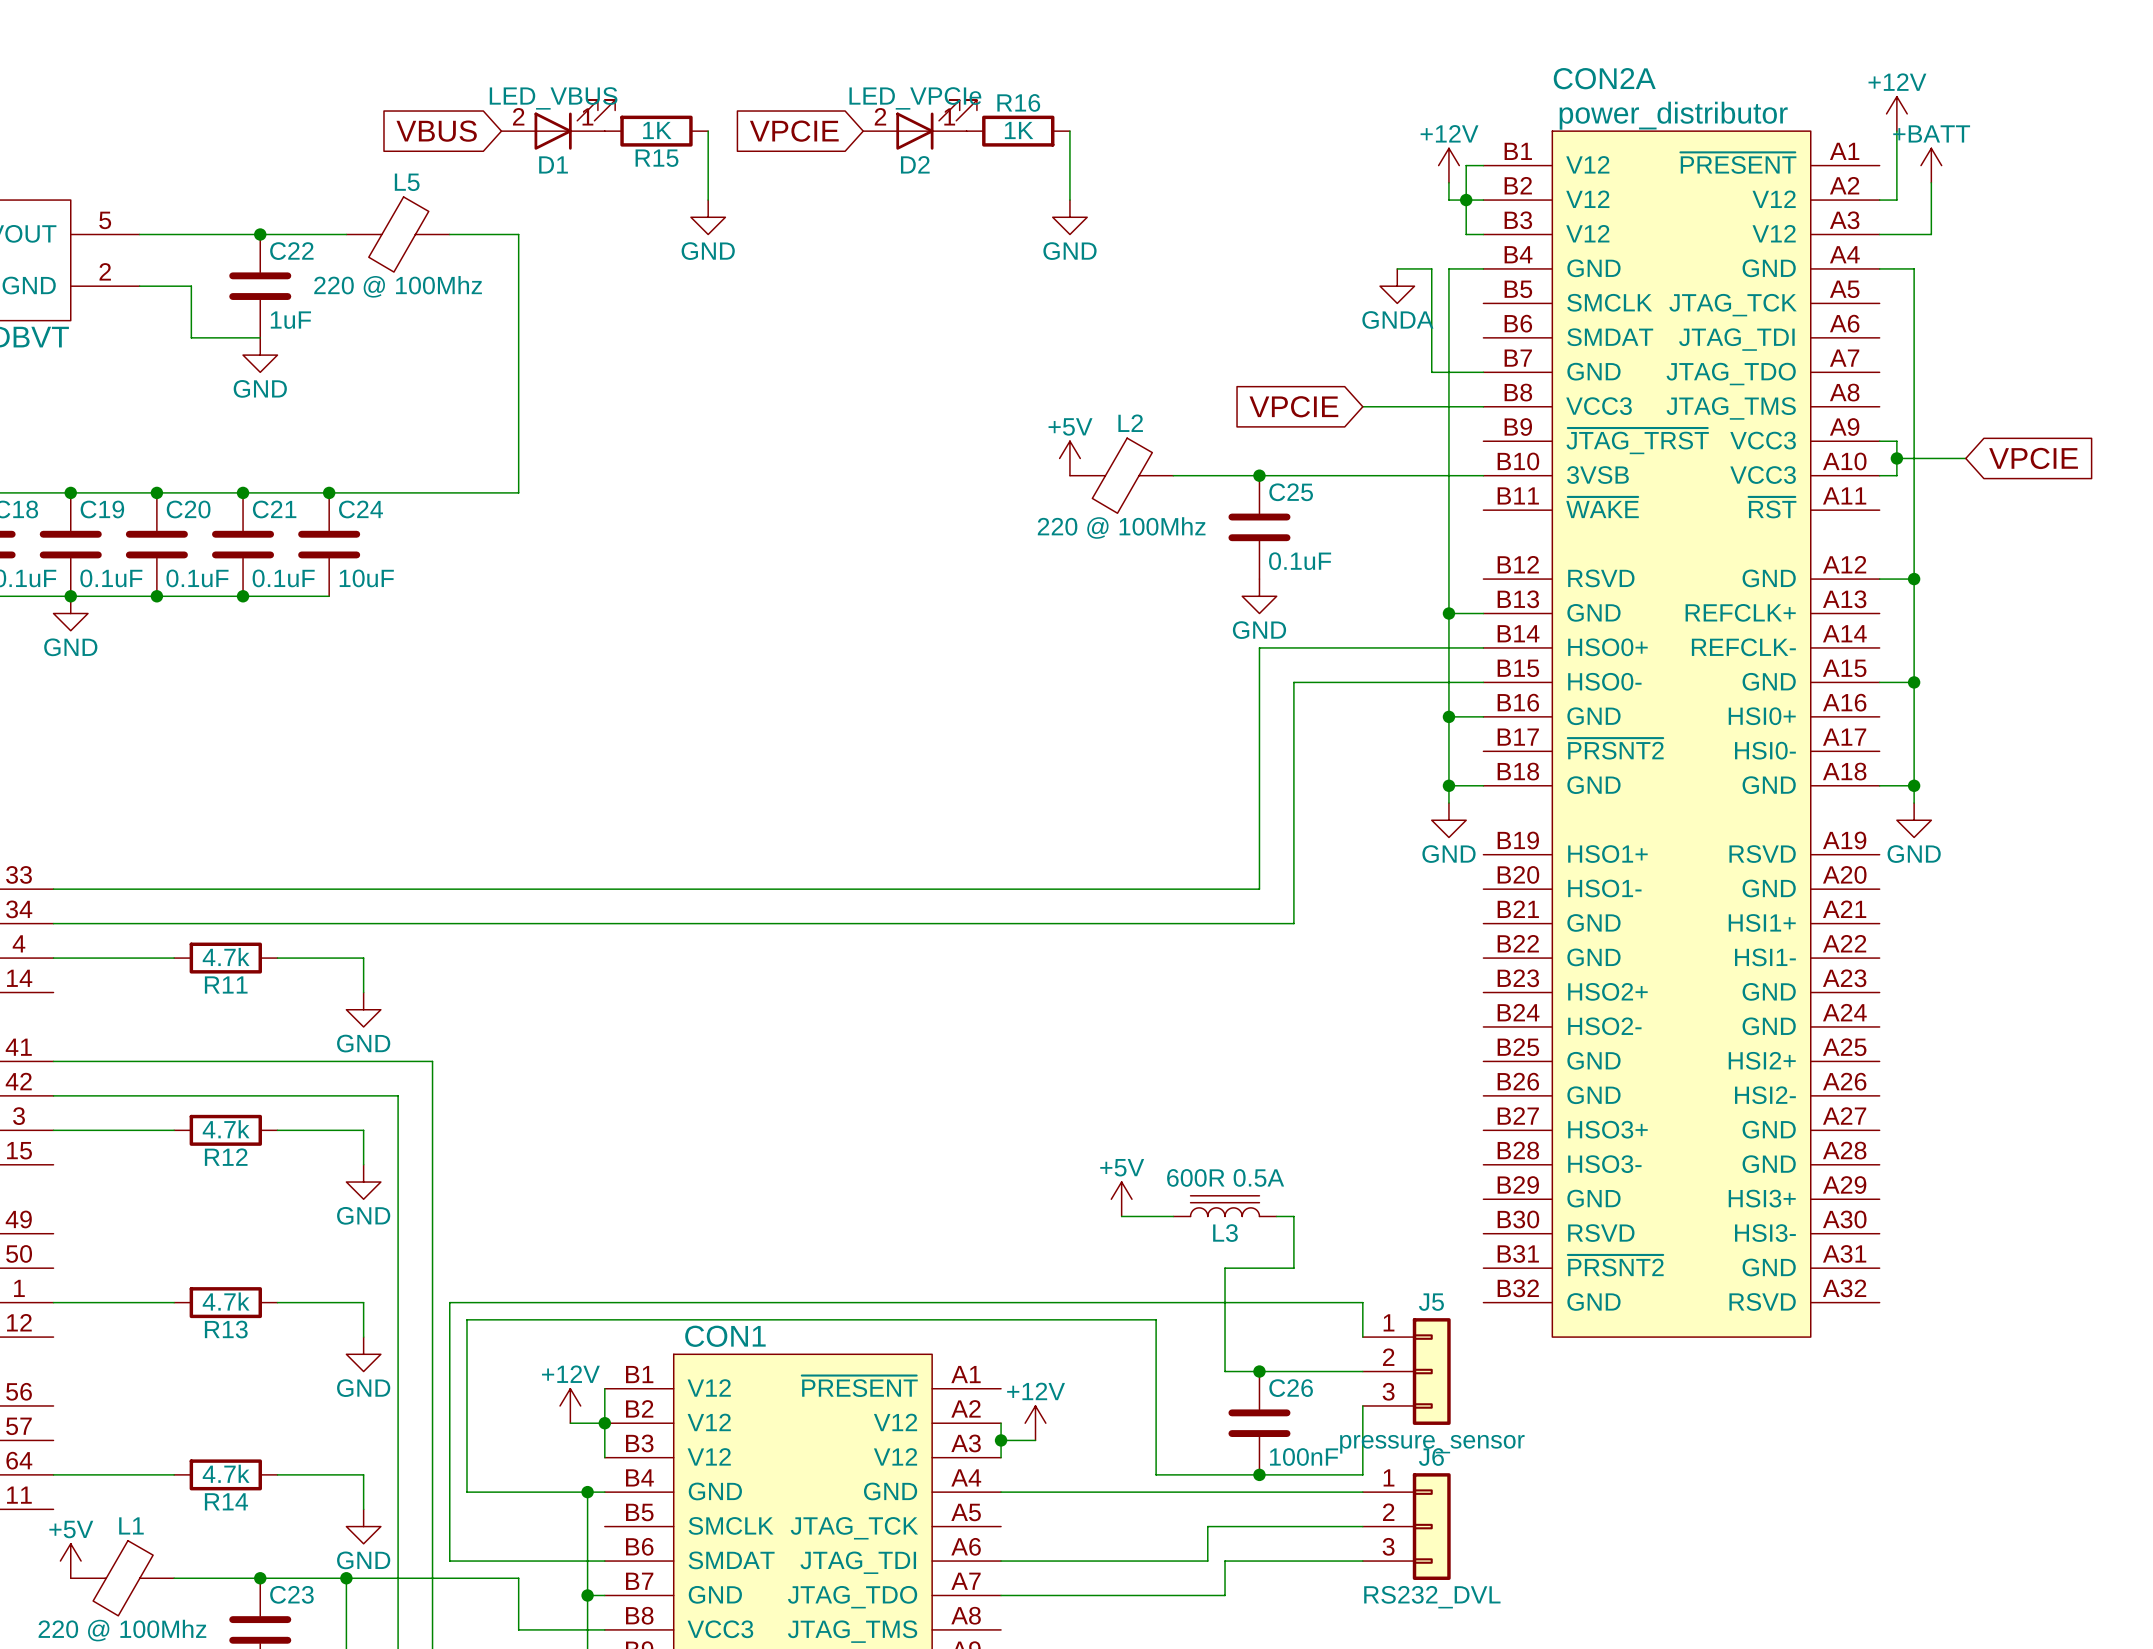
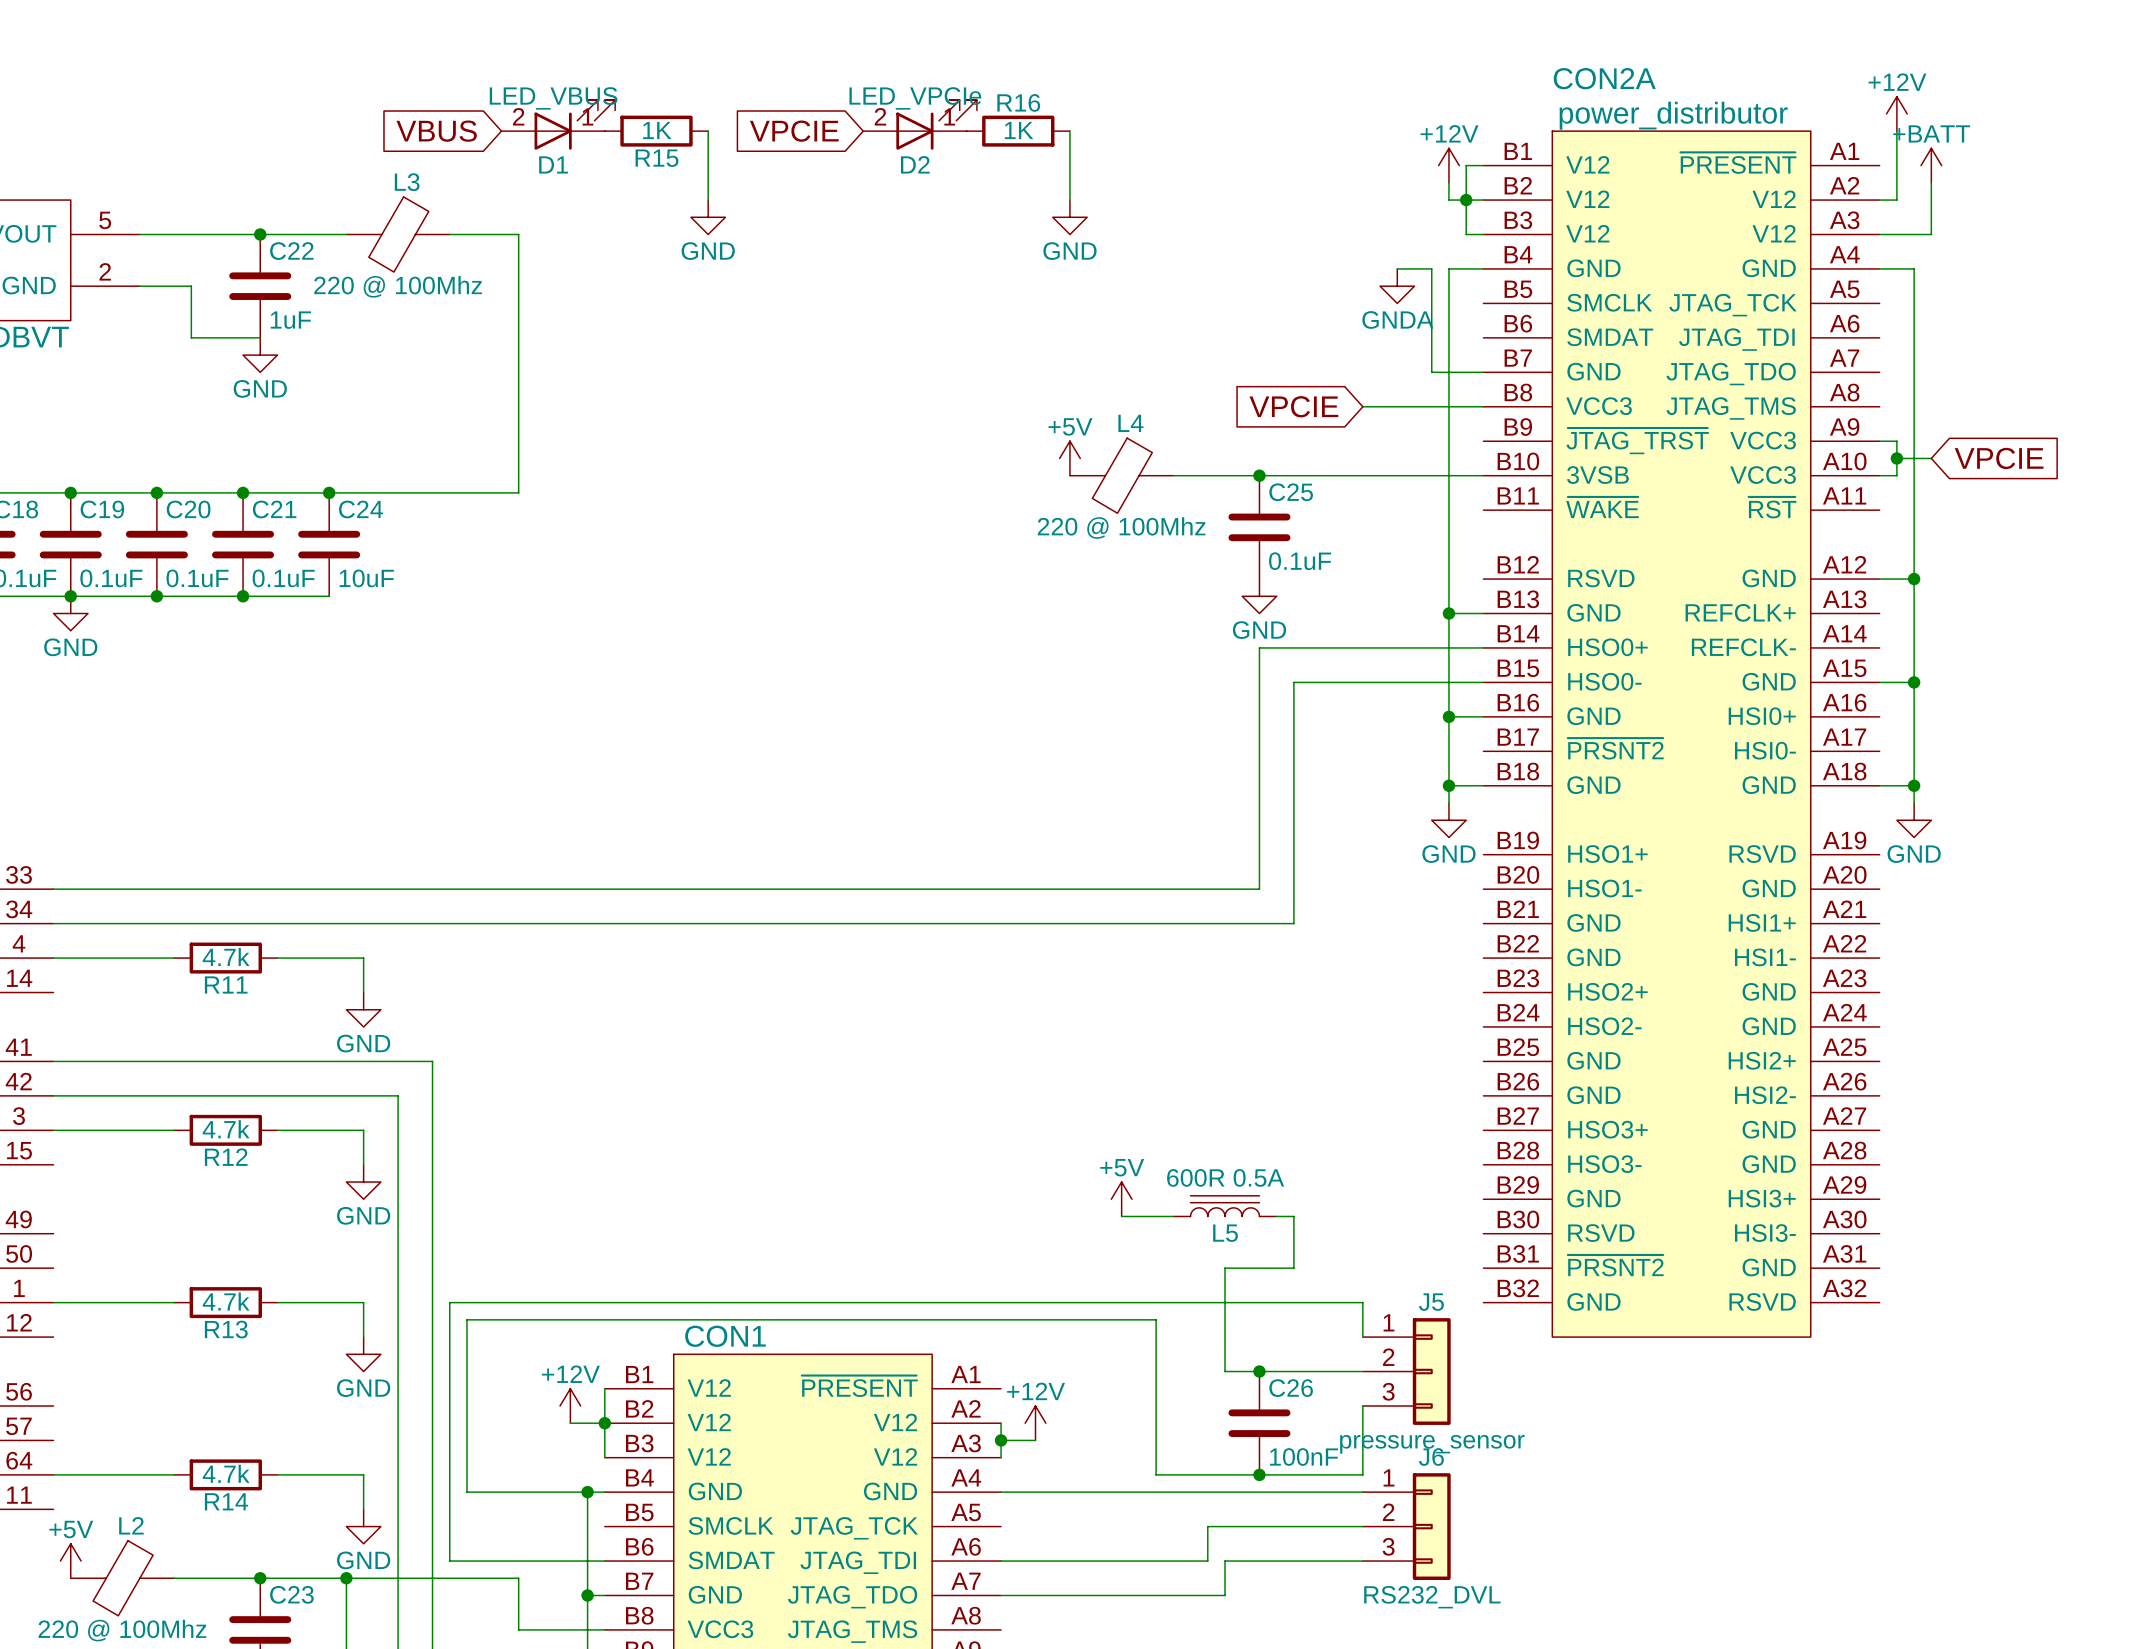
L5 name: L5 (407, 182) -> L3 (407, 182)
L2 name: L2 (1130, 423) -> L4 (1130, 423)
wire: (1931, 458) (1965, 458) -> none
global label position: VPCIE (2033, 458) -> VPCIE (1999, 458)
L3 name: L3 (1225, 1233) -> L5 (1225, 1233)
L1 name: L1 (131, 1525) -> L2 (131, 1525)

